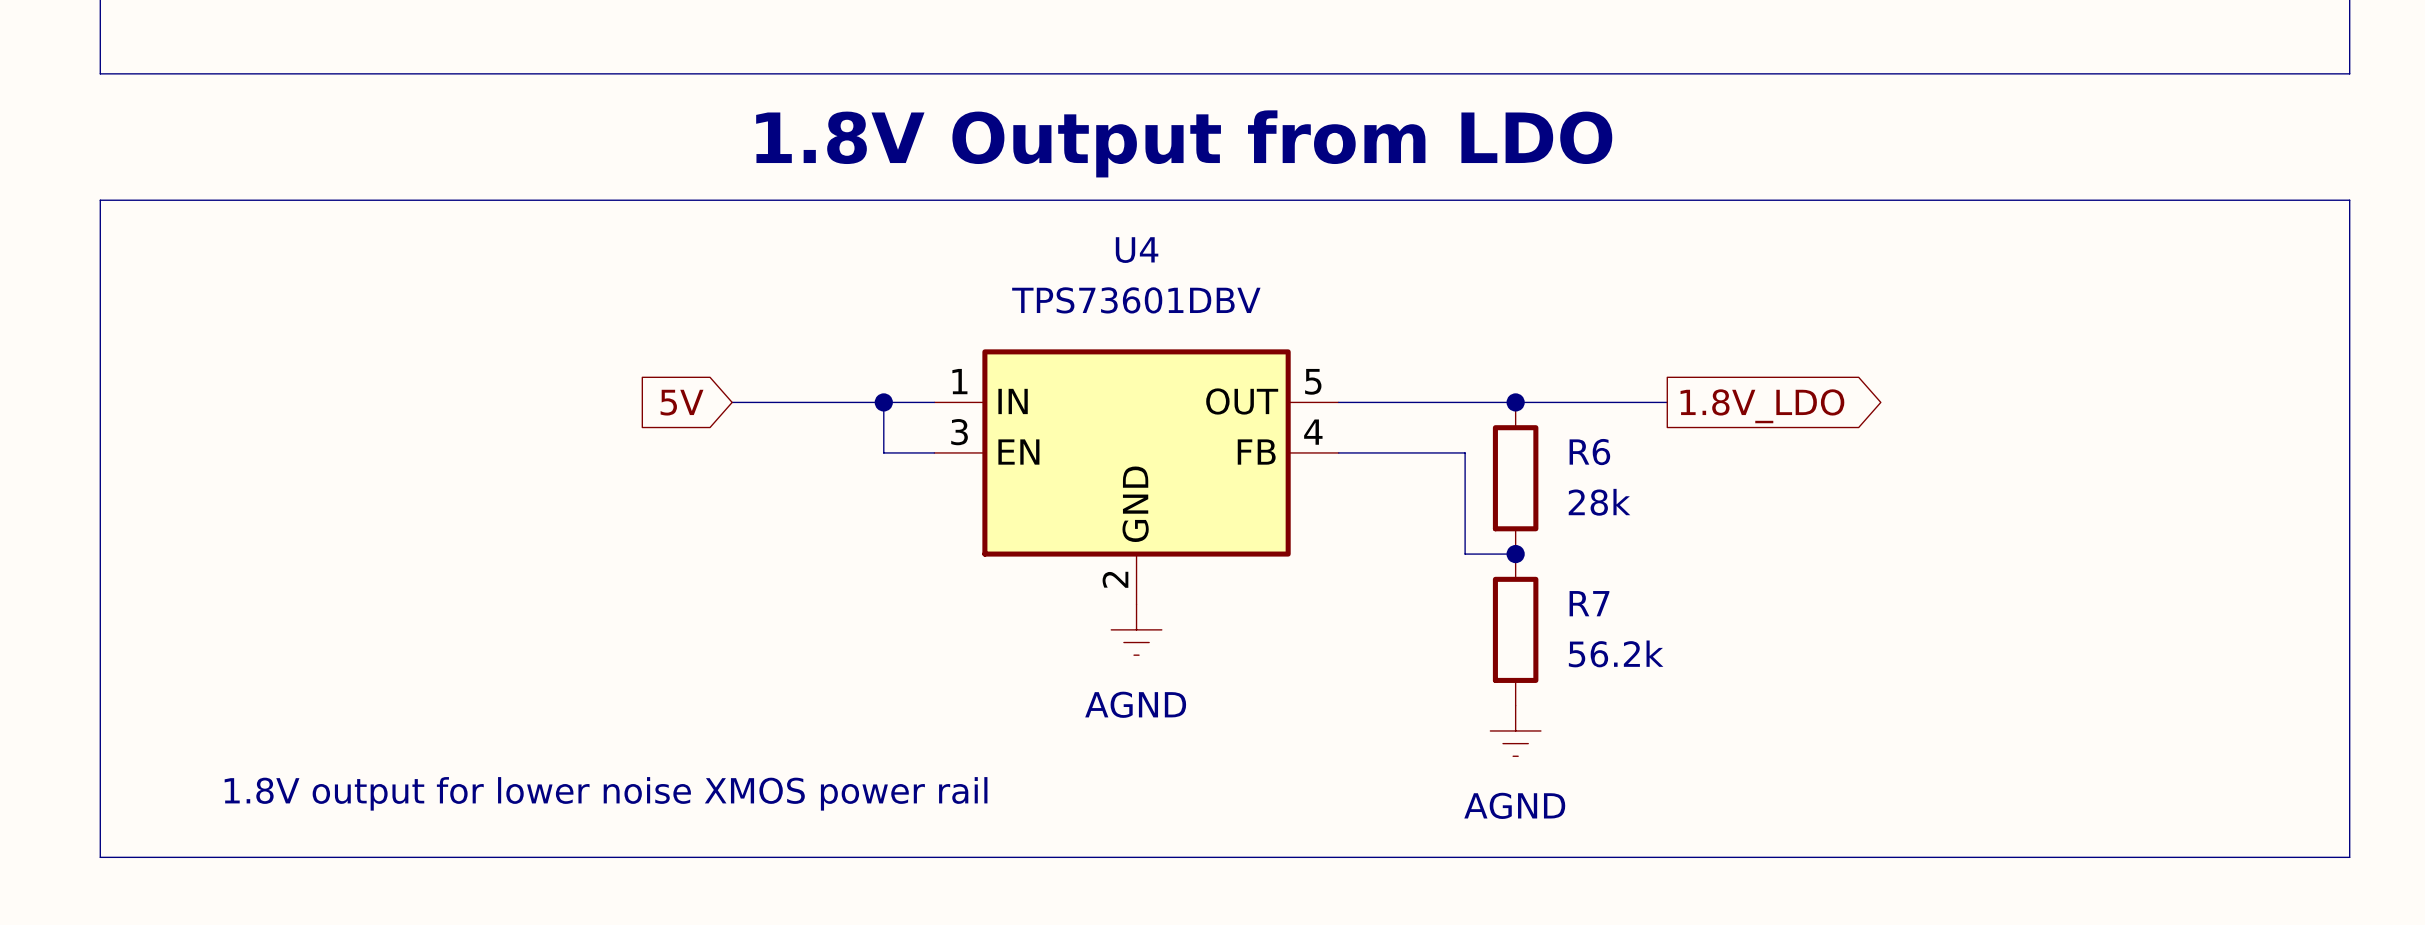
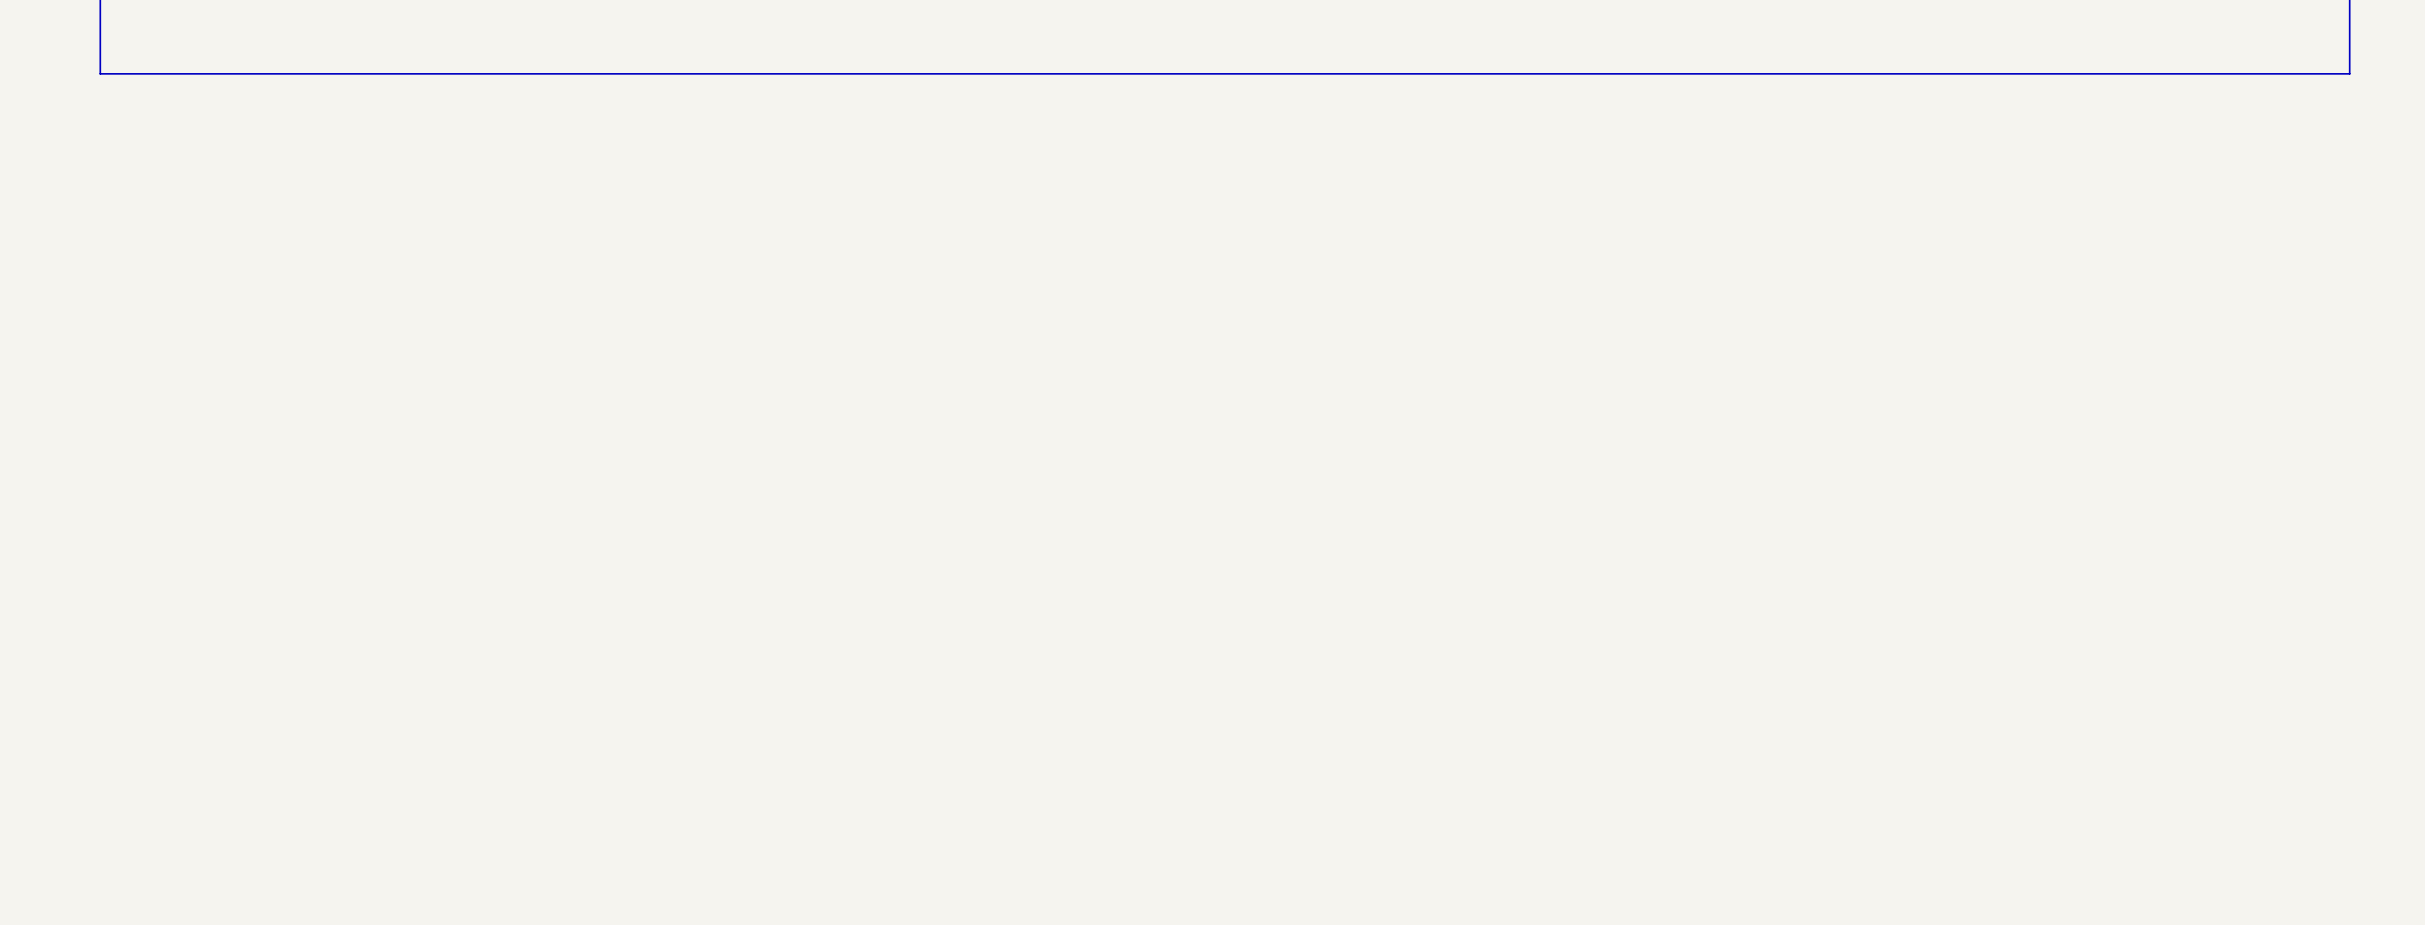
text: 1.8V Output from LDO (1184, 143) -> none
line: (100, 200) (2349, 200) (2349, 857) (100, 857) (100, 200) -> none
global label: 5V (682, 402) -> none
wire: (732, 402) (934, 402) -> none
wire: (883, 402) (883, 452) (934, 452) -> none
junction: (883, 402) -> none
wire: (1338, 402) (1667, 402) -> none
junction: (1515, 402) -> none
global label: 1.8V_LDO (1762, 406) -> none
wire: (1338, 452) (1465, 452) (1465, 554) (1515, 554) -> none
U4: TPS73601DBV (1136, 476) -> none
R6: 28k (1515, 478) -> none
junction: (1515, 554) -> none
power symbol: AGND (1136, 629) -> none
R7: 56.2k (1515, 629) -> none
power symbol: AGND (1515, 730) -> none
text: 1.8V output for lower noise XMOS power rail (606, 793) -> none

